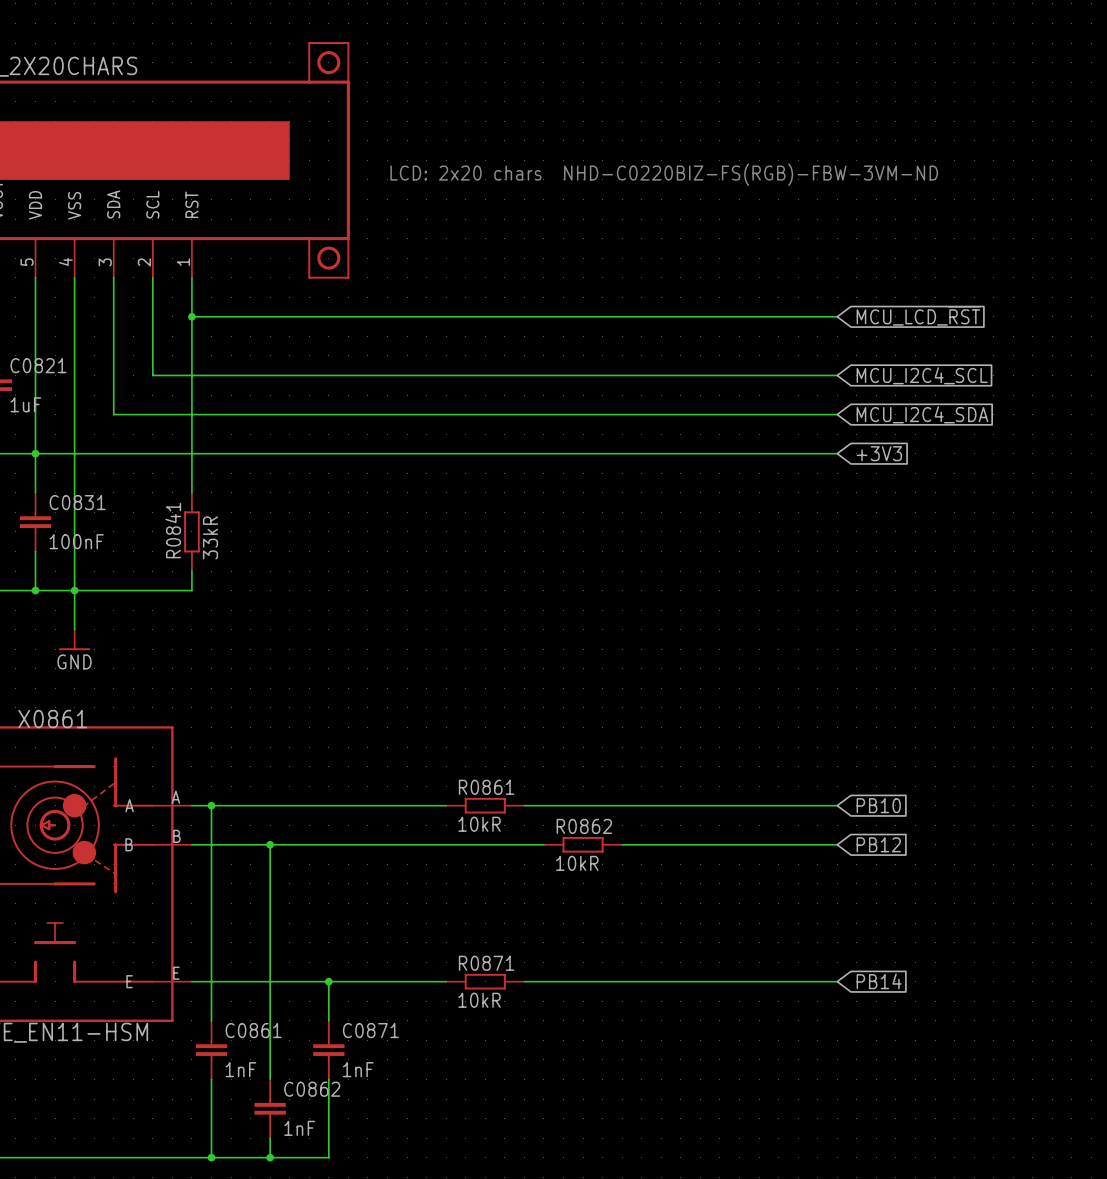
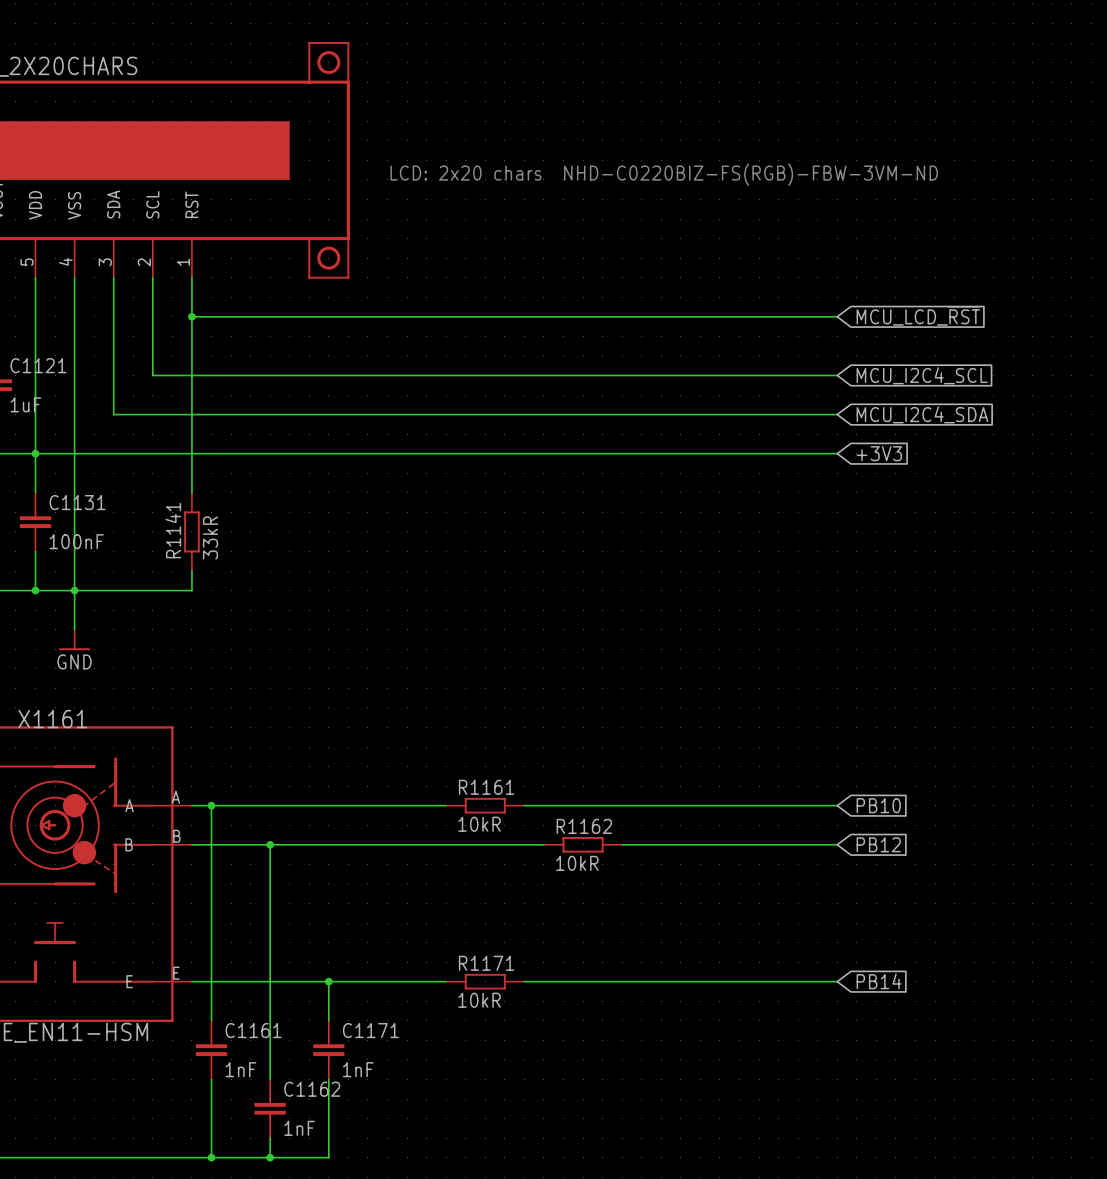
C0821 name: C0821 (38, 365) -> C1121 (38, 365)
C0831 name: C0831 (77, 502) -> C1131 (77, 502)
R0841 name: R0841 (173, 530) -> R1141 (173, 530)
X0861 name: X0861 (52, 719) -> X1161 (52, 719)
R0861 name: R0861 (486, 787) -> R1161 (486, 787)
R0862 name: R0862 (584, 826) -> R1162 (584, 826)
R0871 name: R0871 (486, 963) -> R1171 (486, 963)
C0861 name: C0861 (253, 1030) -> C1161 (253, 1030)
C0871 name: C0871 (370, 1030) -> C1171 (370, 1030)
C0862 name: C0862 (312, 1089) -> C1162 (312, 1089)

